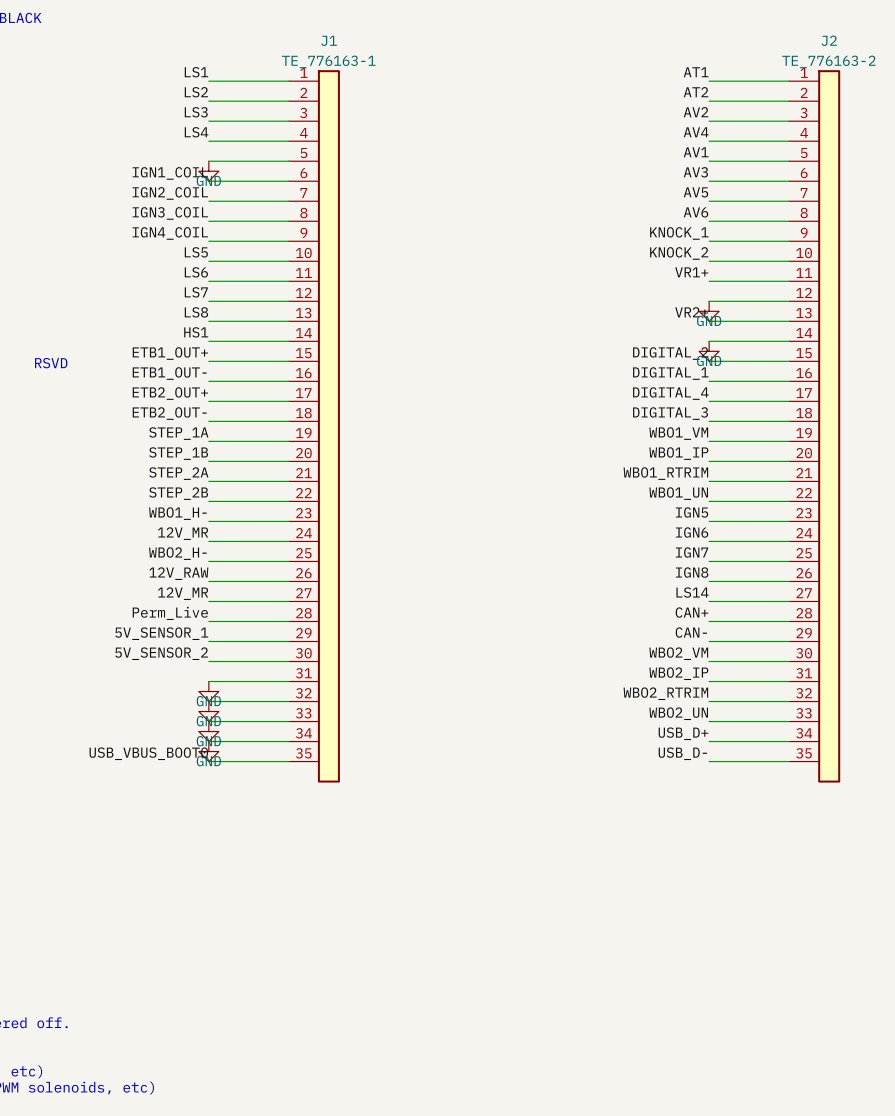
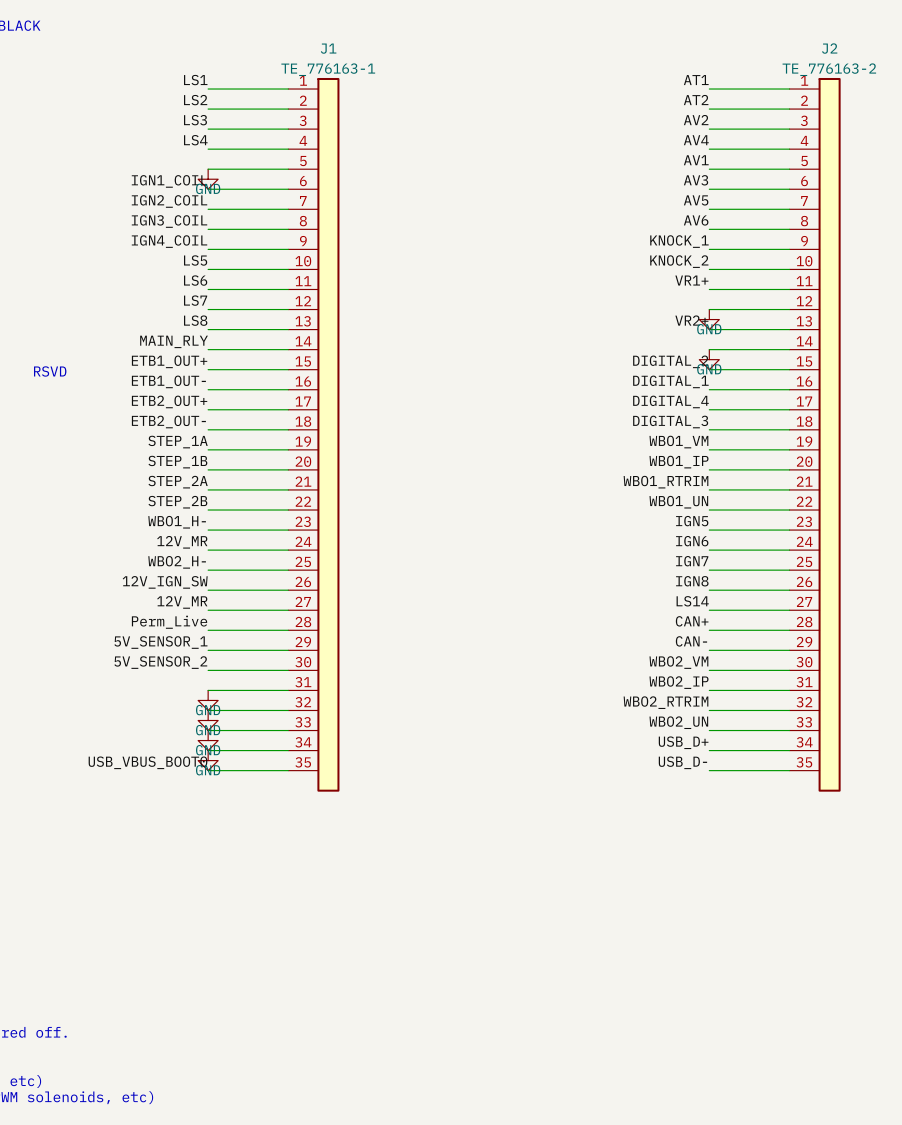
label: HS1 (196, 332) -> MAIN_RLY (174, 341)
label: 12V_RAW (178, 573) -> 12V_IGN_SW (165, 582)

